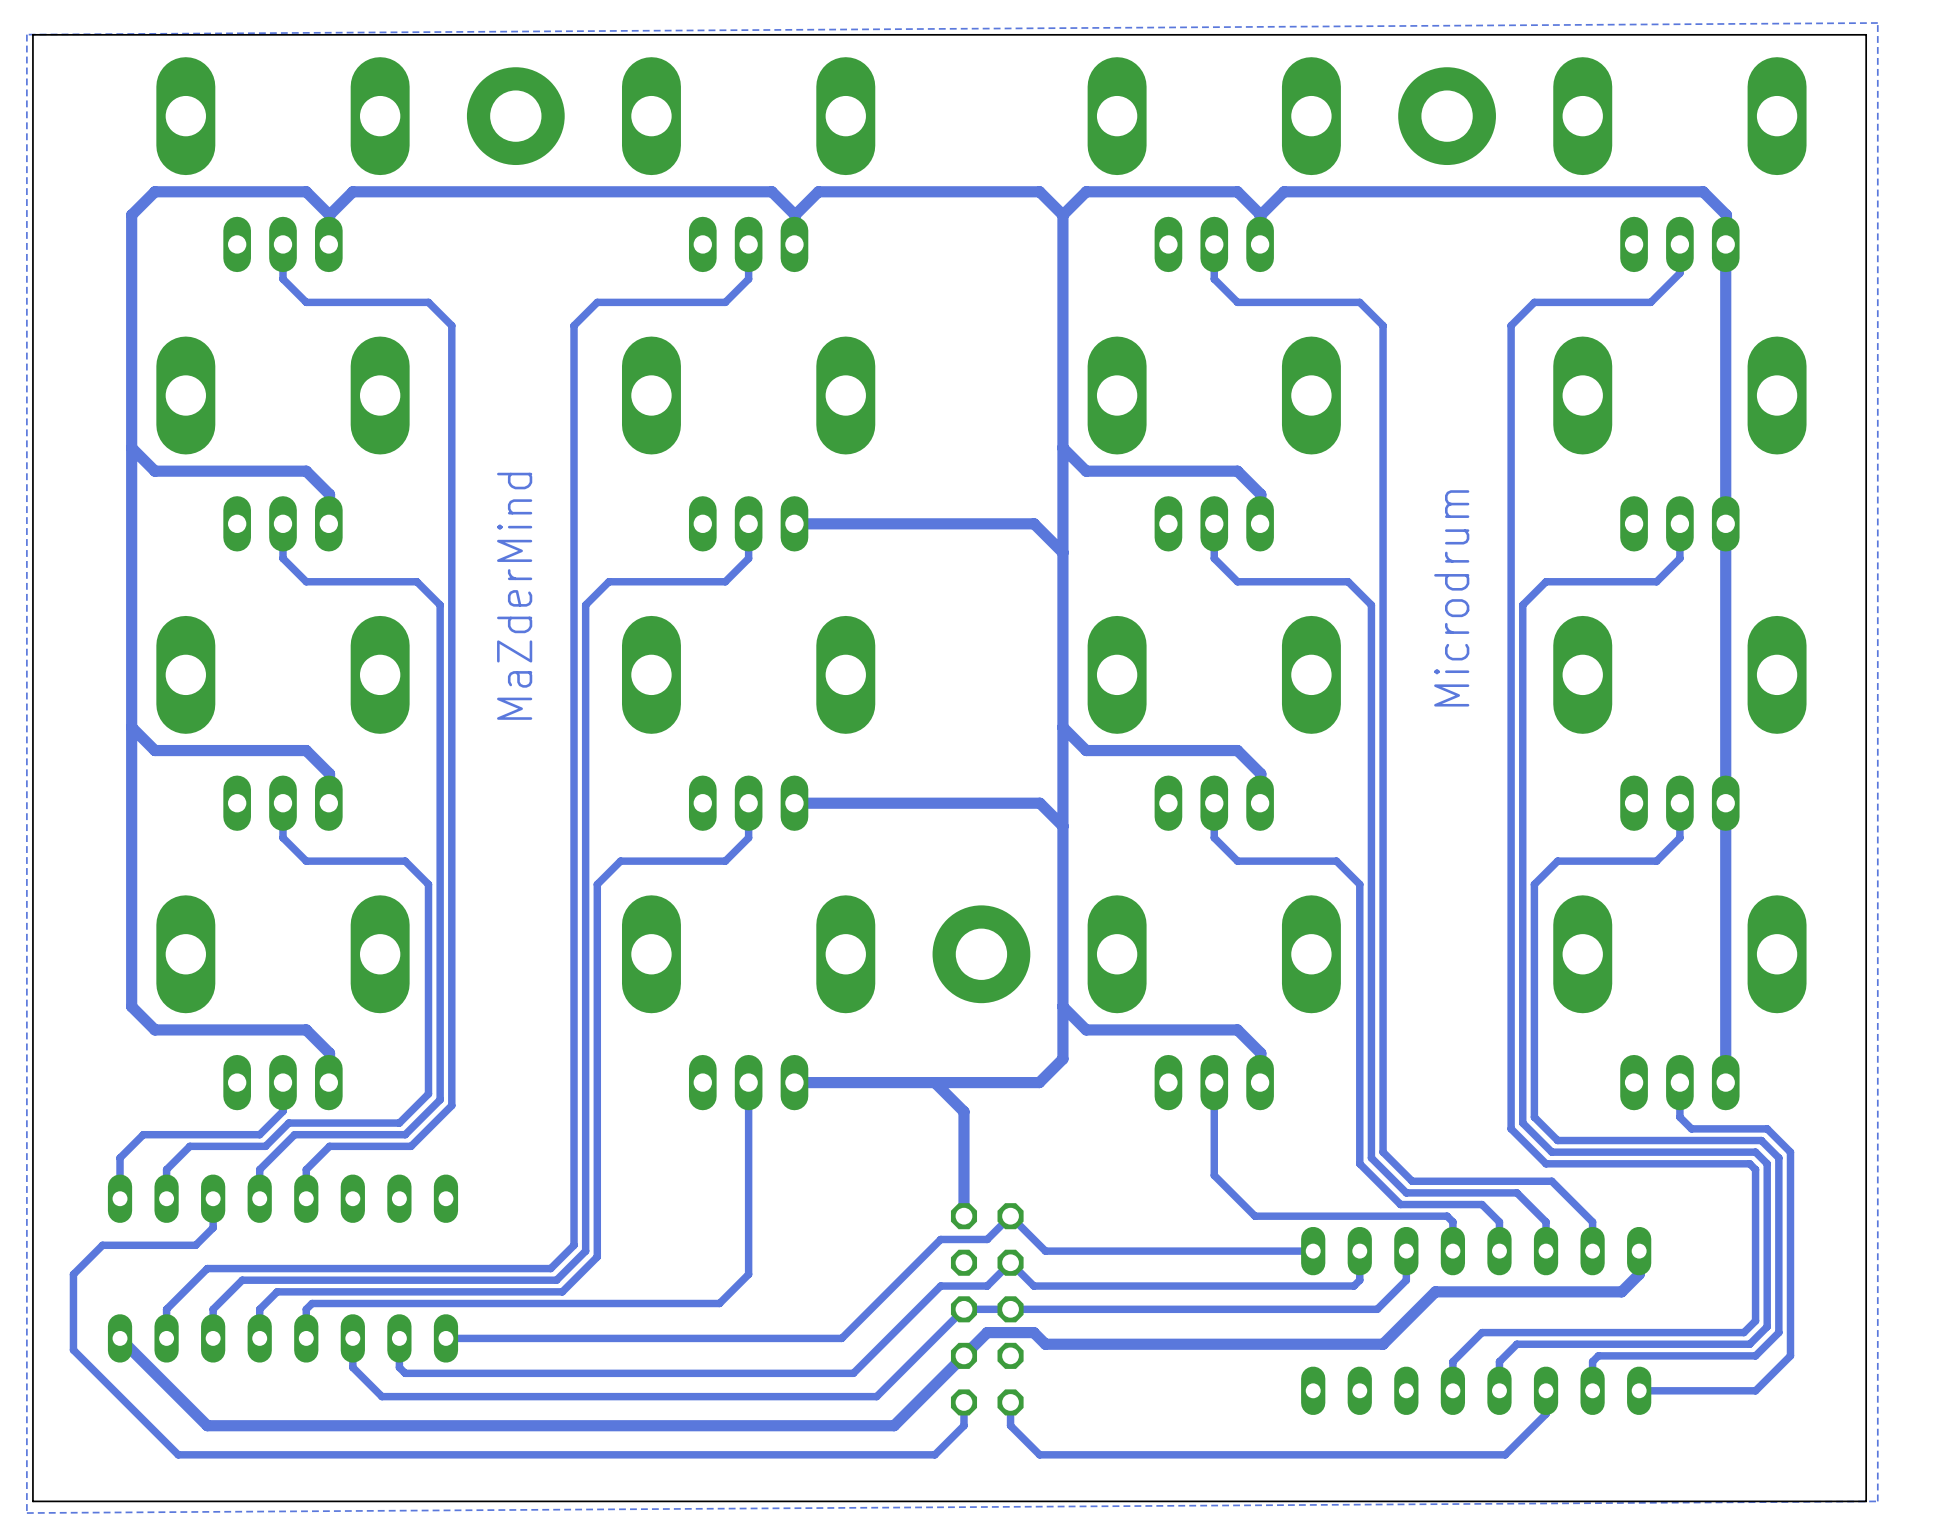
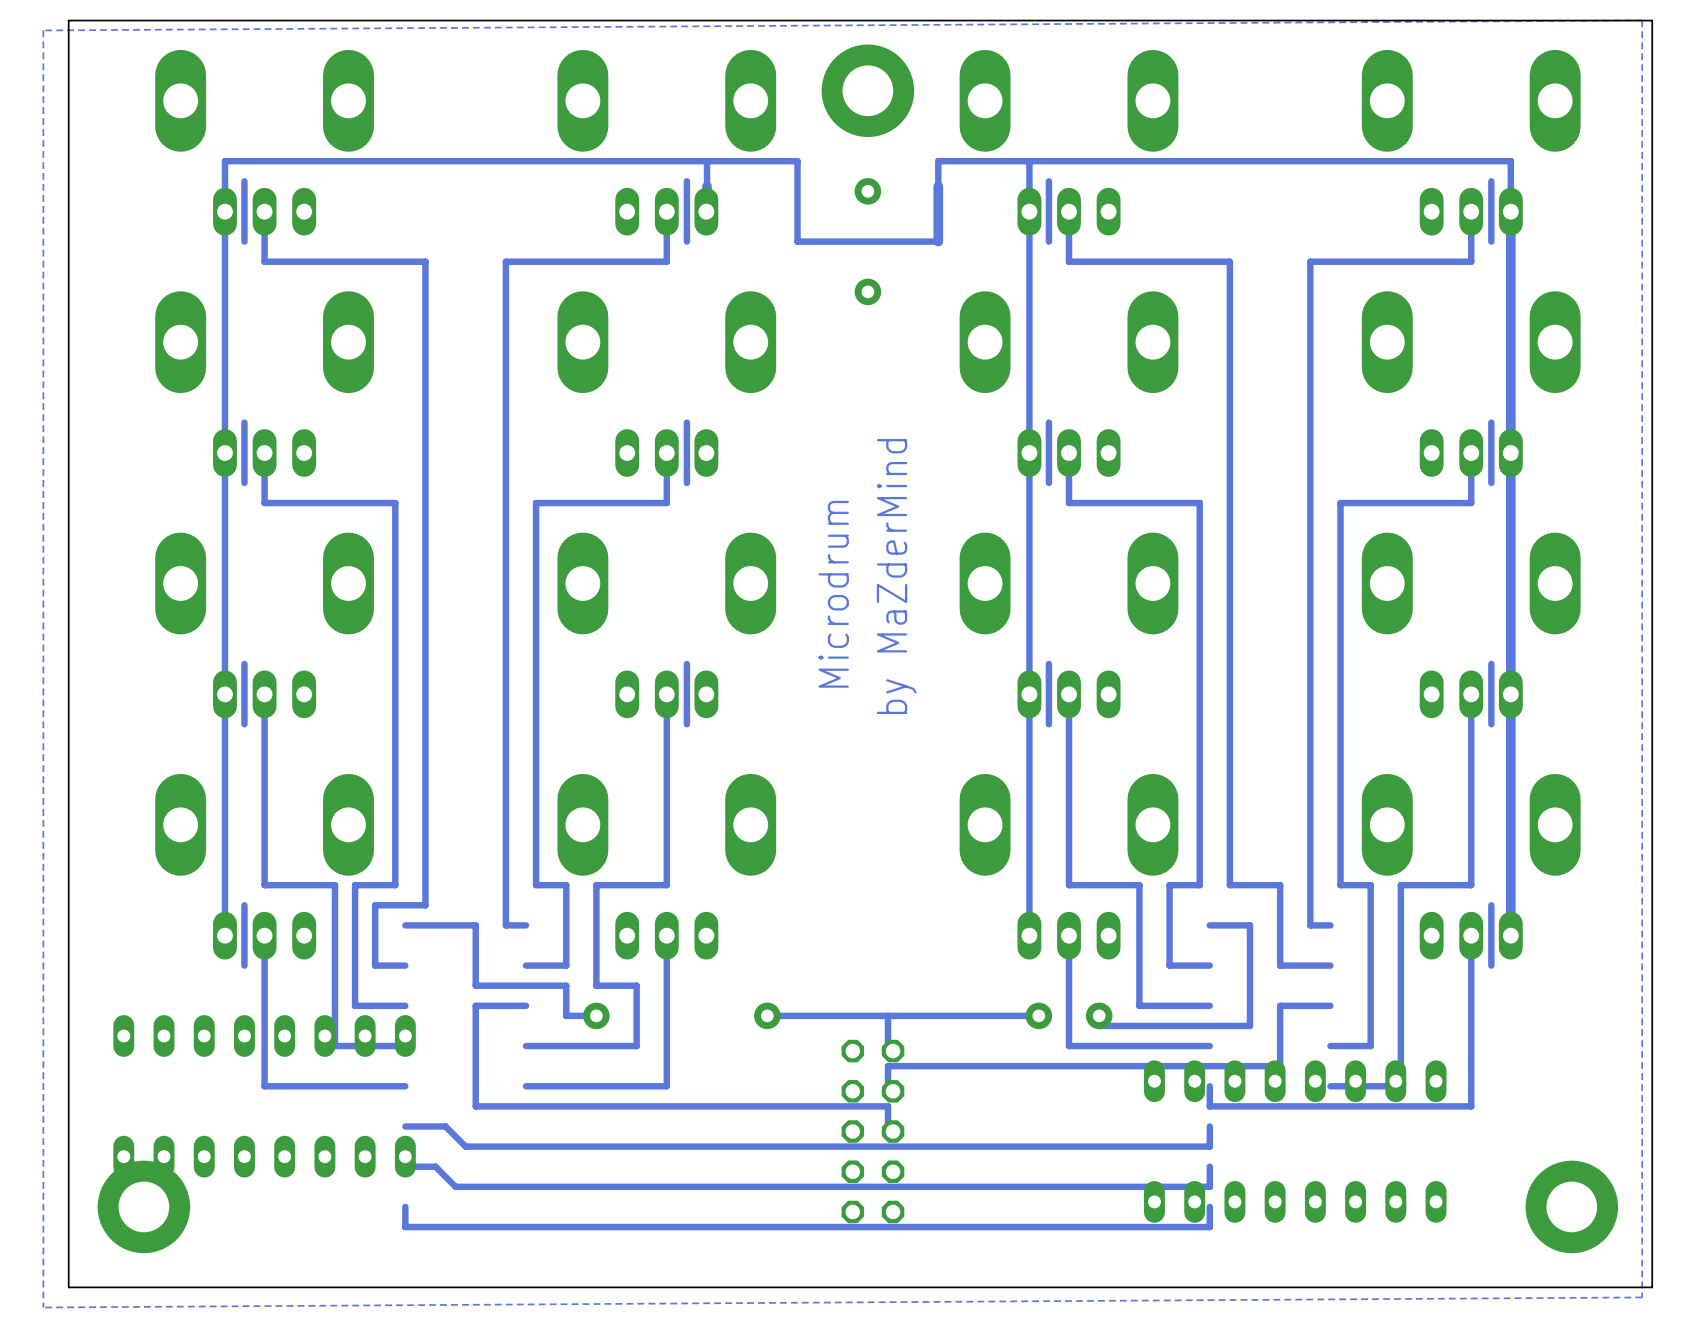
board edge: (1866, 34) (32, 34) (32, 1501) (1866, 1501) (1866, 34) -> (1652, 20) (68, 20) (68, 1287) (1652, 1287) (1652, 20)
part: none -> (867, 90)
part: (515, 116) -> none
part: (1447, 116) -> none
track: none -> (707, 161) (707, 186)
track: none -> (1029, 161) (1029, 935)
track: none -> (244, 181) (244, 241)
track: none -> (686, 181) (686, 241)
track: none -> (1048, 181) (1048, 241)
track: none -> (1491, 181) (1491, 241)
track: (329, 215) (352, 191) (771, 191) (795, 215) (818, 191) (1039, 191) (1062, 215) (1086, 191) (1237, 191) (1260, 214) (1260, 244) (1260, 215) (1284, 191) (1703, 191) (1726, 215) (1725, 244) -> (938, 186) (938, 161) (1510, 161) (1510, 211)
track: (329, 215) (306, 191) (154, 191) (131, 215) (131, 1006) (154, 1029) (306, 1029) (329, 1053) (328, 1082) -> none
via: none -> (867, 191)
track: (1679, 273) (1650, 302) -> (1471, 236) (1471, 261) (1446, 261)
track: (282, 279) (306, 302) -> (264, 241) (264, 261) (284, 261)
track: (748, 279) (725, 302) -> (666, 241) (666, 261) (646, 261)
track: (1062, 279) (1062, 447) -> (938, 241) (797, 241) (797, 161) (224, 161) (224, 935)
track: (1214, 279) (1237, 302) -> (1069, 241) (1069, 261) (1089, 261)
track: (428, 302) (451, 325) (451, 1105) (411, 1146) (329, 1146) (306, 1169) (306, 1198) -> (390, 261) (425, 261) (425, 905) (375, 905) (375, 965) (405, 965)
track: (597, 302) (574, 325) (574, 1245) (550, 1268) (207, 1268) (166, 1309) (166, 1338) -> (536, 261) (505, 261) (505, 925) (526, 925)
track: (1359, 302) (1383, 325) (1383, 1152) (1412, 1181) (1551, 1181) (1592, 1222) (1592, 1251) -> (1194, 261) (1229, 261) (1229, 885) (1280, 885) (1280, 965) (1330, 965)
track: (1534, 302) (1511, 325) (1511, 1128) (1546, 1163) (1749, 1163) (1755, 1169) (1755, 1320) (1743, 1332) (1482, 1332) (1452, 1361) (1452, 1390) -> (1345, 261) (1310, 261) (1310, 925) (1330, 925)
via: none -> (867, 291)
track: (131, 447) (154, 471) (306, 471) (329, 494) (328, 523) -> none
track: (1062, 447) (1086, 471) (1237, 471) (1260, 494) (1260, 523) -> none
track: (1062, 447) (1062, 1059) (1039, 1082) (794, 1082) -> none
track: none -> (244, 422) (244, 482)
track: none -> (686, 422) (686, 482)
track: none -> (1048, 422) (1048, 482)
track: none -> (1491, 422) (1491, 482)
track: (794, 523) (1034, 523) (1062, 552) -> none
track: (282, 558) (306, 581) -> (264, 482) (264, 503) (284, 503)
track: (748, 558) (725, 581) -> (666, 482) (666, 503) (646, 503)
track: (1214, 558) (1237, 581) -> (1069, 482) (1069, 503) (1089, 503)
track: (1679, 558) (1656, 581) -> (1471, 482) (1471, 503) (1451, 503)
track: (416, 581) (440, 605) (440, 1099) (405, 1134) (294, 1134) (259, 1169) (259, 1198) -> (380, 503) (395, 503) (395, 885) (355, 885) (355, 1005) (405, 1005)
track: (608, 581) (585, 605) (585, 1251) (556, 1280) -> (888, 1126) (888, 1106) (500, 1106)
track: (1348, 581) (1371, 605) (1371, 1157) (1406, 1192) (1516, 1192) (1546, 1222) (1546, 1251) -> (1184, 503) (1199, 503) (1199, 885) (1169, 885) (1169, 965) (1209, 965)
track: (1546, 581) (1522, 605) (1522, 1123) (1551, 1152) (1755, 1152) (1767, 1163) (1767, 1326) (1749, 1344) (1516, 1344) (1499, 1361) (1499, 1390) -> (1355, 503) (1340, 503) (1340, 885) (1370, 885) (1370, 1046) (1330, 1046)
text: MaZderMind (514, 596) -> none
text: Microdrum (1451, 598) -> none
text: none -> by MaZderMind (896, 576)
text: none -> Microdrum (833, 594)
track: (131, 727) (154, 750) (306, 750) (329, 773) (328, 803) -> none
track: (1062, 727) (1086, 750) (1237, 750) (1260, 773) (1260, 803) -> none
track: none -> (244, 663) (244, 724)
track: none -> (686, 663) (686, 724)
track: none -> (1048, 663) (1048, 724)
track: none -> (1491, 663) (1491, 724)
track: (794, 803) (1039, 803) (1062, 826) -> none
track: (282, 837) (306, 861) (405, 861) (428, 884) (428, 1093) (399, 1123) (288, 1123) (265, 1146) (189, 1146) (166, 1169) (166, 1198) -> (264, 724) (264, 885) (334, 885) (334, 1046) (405, 1046)
track: (748, 837) (725, 861) (620, 861) (597, 884) -> (546, 503) (536, 503) (536, 764)
track: none -> (666, 724) (666, 885) (596, 885) (596, 985) (636, 985) (636, 1046) (526, 1046)
track: (1214, 837) (1237, 861) (1336, 861) (1359, 884) (1359, 1163) (1400, 1204) (1482, 1204) (1499, 1222) (1499, 1251) -> (1069, 724) (1069, 885) (1139, 885) (1139, 1005) (1209, 1005)
track: (1679, 837) (1656, 861) (1557, 861) (1534, 884) (1534, 1117) (1557, 1140) (1761, 1140) (1778, 1157) (1778, 1332) (1755, 1355) (1598, 1355) (1592, 1361) (1592, 1390) -> (1471, 724) (1471, 885) (1400, 885) (1400, 1086) (1330, 1086)
part: (981, 954) -> none
track: (1062, 1006) (1086, 1029) (1237, 1029) (1260, 1053) (1260, 1082) -> none
track: (597, 1024) (597, 1256) (562, 1291) (277, 1291) (259, 1309) (259, 1338) -> (536, 885) (566, 885) (566, 965) (526, 965)
track: none -> (244, 905) (244, 965)
track: none -> (1491, 905) (1491, 965)
track: none -> (405, 925) (475, 925) (475, 985) (566, 985) (566, 1015) (596, 1015)
track: none -> (1209, 925) (1250, 925) (1250, 1025) (1099, 1025) (1099, 1015)
track: (934, 1082) (963, 1111) (963, 1216) -> none
track: (282, 1111) (259, 1134) (143, 1134) (120, 1157) (120, 1198) -> (264, 960) (264, 1086) (405, 1086)
track: (1679, 1117) (1691, 1128) (1767, 1128) (1790, 1152) (1790, 1355) (1755, 1390) (1639, 1390) -> (1471, 965) (1471, 1106) (1209, 1106) (1209, 1086)
track: none -> (1330, 1005) (1280, 1005) (1280, 1066) (888, 1066) (888, 1086)
via: none -> (596, 1015)
via: none -> (767, 1015)
track: none -> (888, 1015) (888, 1046)
track: none -> (1038, 1015) (767, 1015)
via: none -> (1038, 1015)
track: (1214, 1175) (1255, 1216) (1447, 1216) (1452, 1222) (1452, 1251) -> (1069, 1015) (1069, 1046) (1209, 1046)
via: none -> (1099, 1015)
track: (213, 1198) (213, 1227) (195, 1245) (102, 1245) (73, 1274) (73, 1350) (178, 1454) (934, 1454) (963, 1425) (963, 1402) -> none
track: (1313, 1251) (1045, 1251) (1010, 1216) (987, 1239) (940, 1239) (841, 1338) (445, 1338) -> none
track: (1359, 1251) (1359, 1280) (1353, 1286) (1033, 1286) (1010, 1262) (987, 1286) (940, 1286) (853, 1373) -> (1209, 1166) (1209, 1186) (757, 1186)
track: (1406, 1251) (1406, 1280) (1377, 1309) (963, 1309) (876, 1396) (381, 1396) (352, 1367) (352, 1338) -> none
track: (1639, 1251) (1639, 1274) (1621, 1291) (1435, 1291) (1383, 1344) (1045, 1344) (1033, 1332) (987, 1332) (894, 1425) (207, 1425) (120, 1338) -> none
track: (748, 1256) (748, 1274) (719, 1303) (492, 1303) -> (666, 1086) (526, 1086)
track: (527, 1280) (242, 1280) (213, 1309) (213, 1338) -> (475, 1106) (475, 1005) (526, 1005)
track: (445, 1303) (312, 1303) (306, 1309) (306, 1338) -> none
track: none -> (1209, 1126) (1209, 1146) (465, 1146) (445, 1126)
track: (399, 1338) (399, 1367) (405, 1373) (504, 1373) -> (405, 1166) (435, 1166) (455, 1186)
track: (1546, 1390) (1546, 1414) (1505, 1454) (1039, 1454) (1010, 1425) (1010, 1402) -> none
part: none -> (143, 1206)
track: none -> (1209, 1206) (1209, 1227) (405, 1227) (405, 1206)
part: none -> (1571, 1206)

